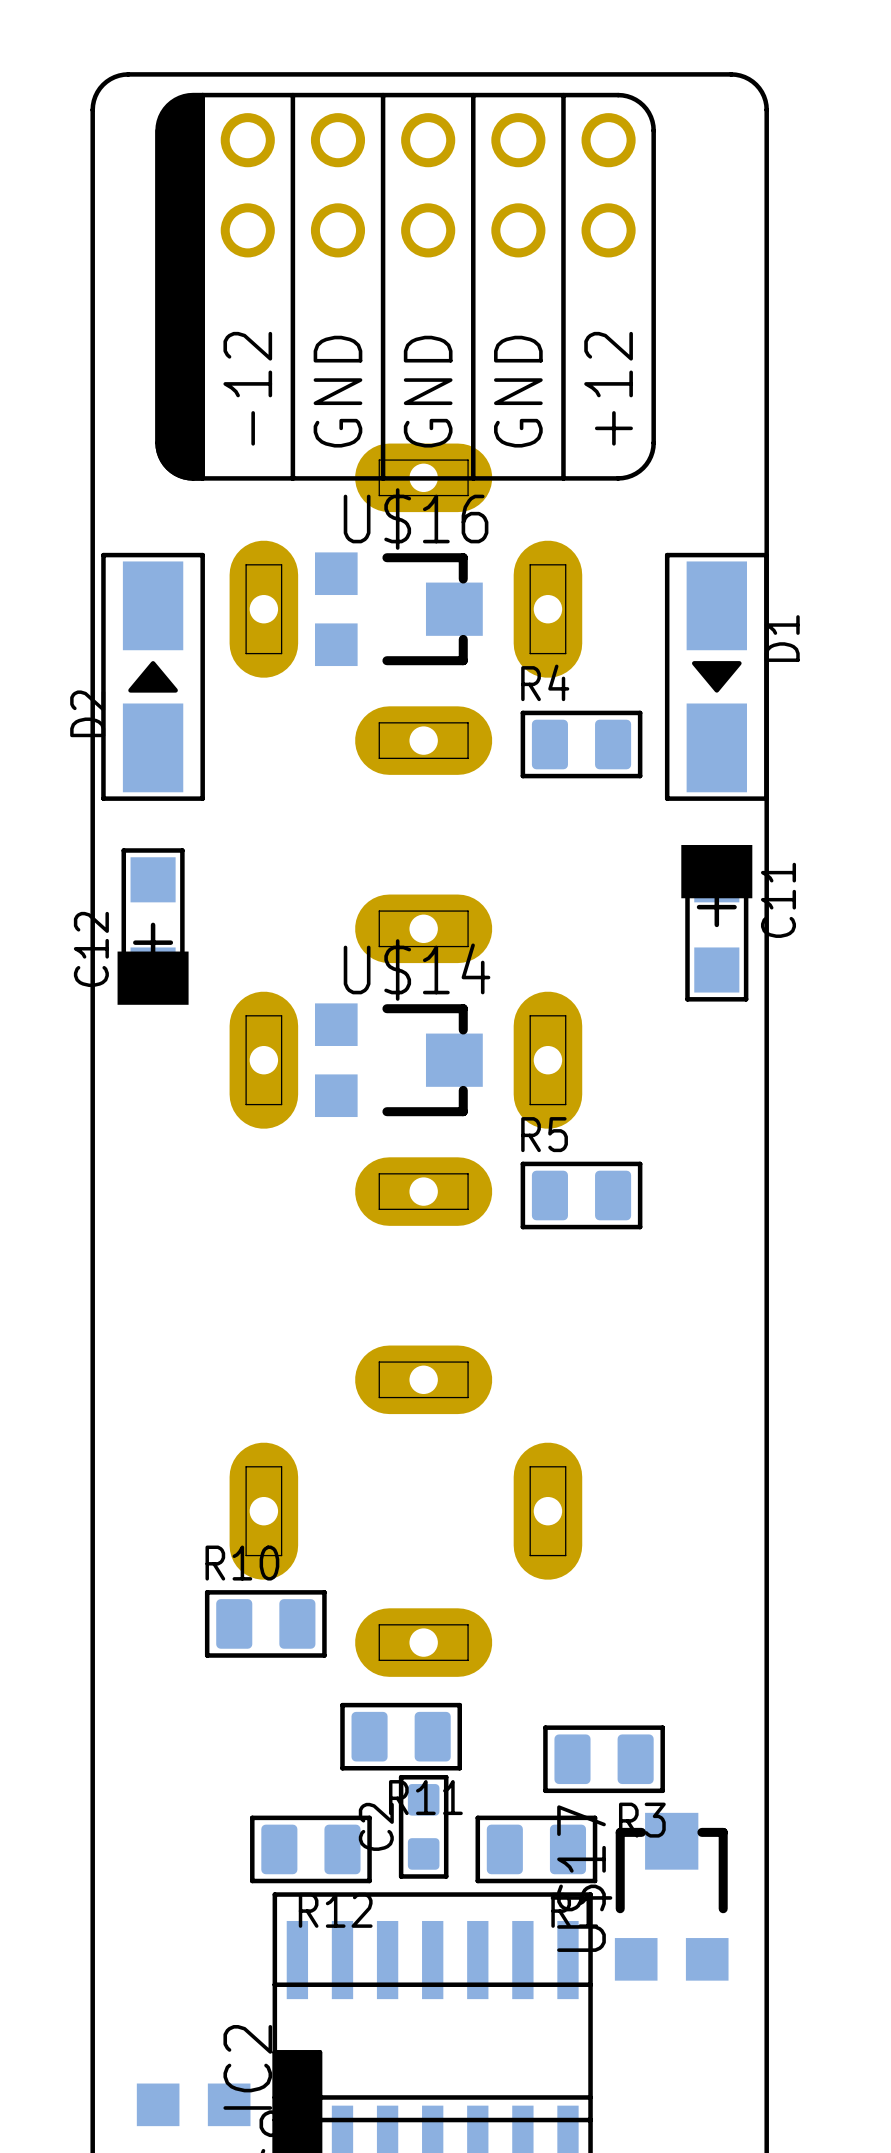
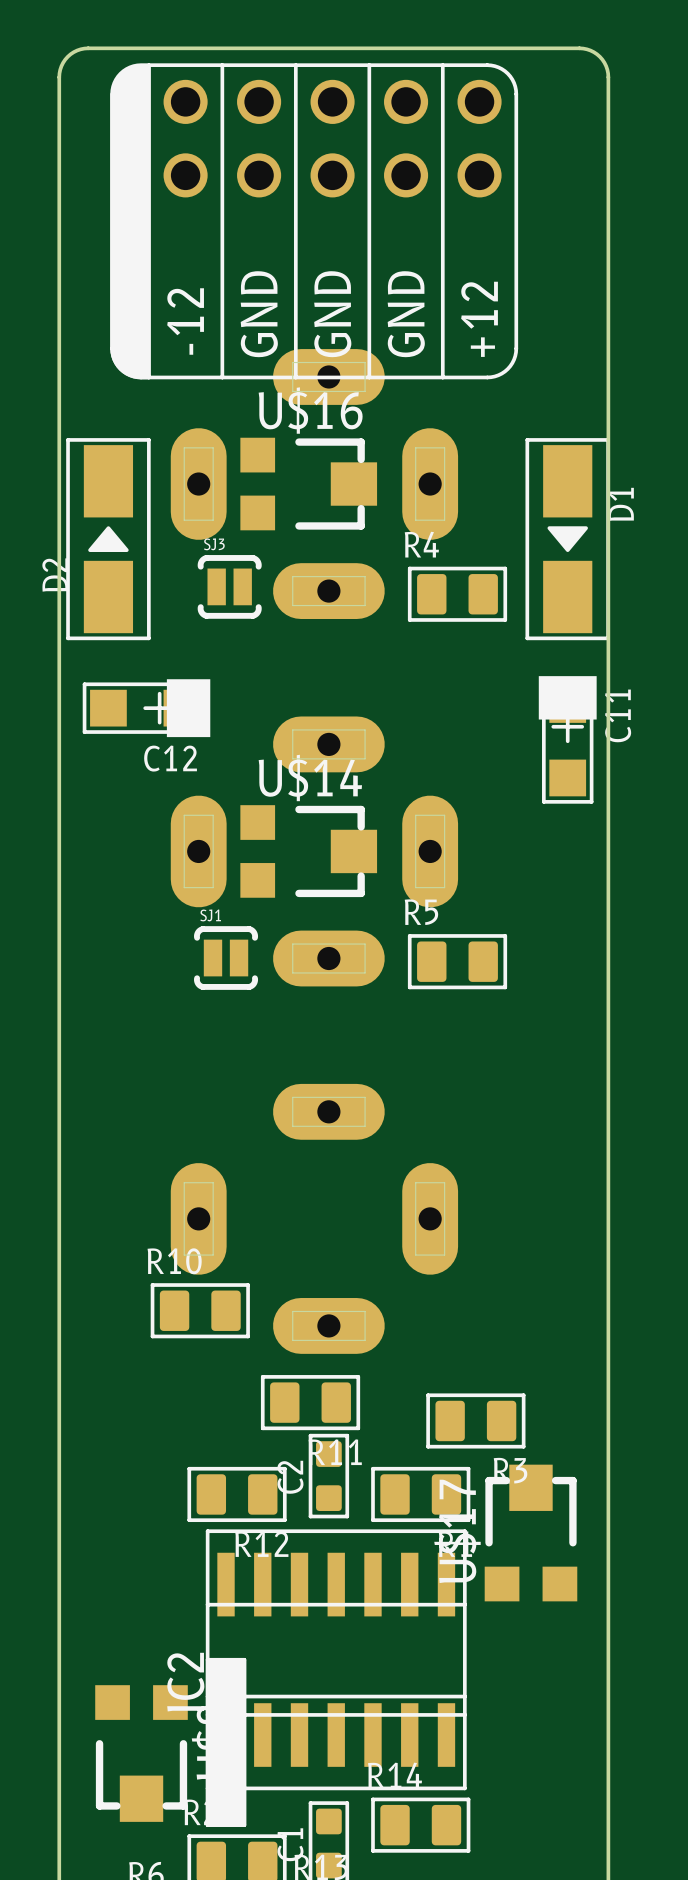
SJ3: none -> (229, 586)
C12 rotation: 0° (153, 926) -> 90° counterclockwise (146, 708)
SJ1: none -> (226, 958)

